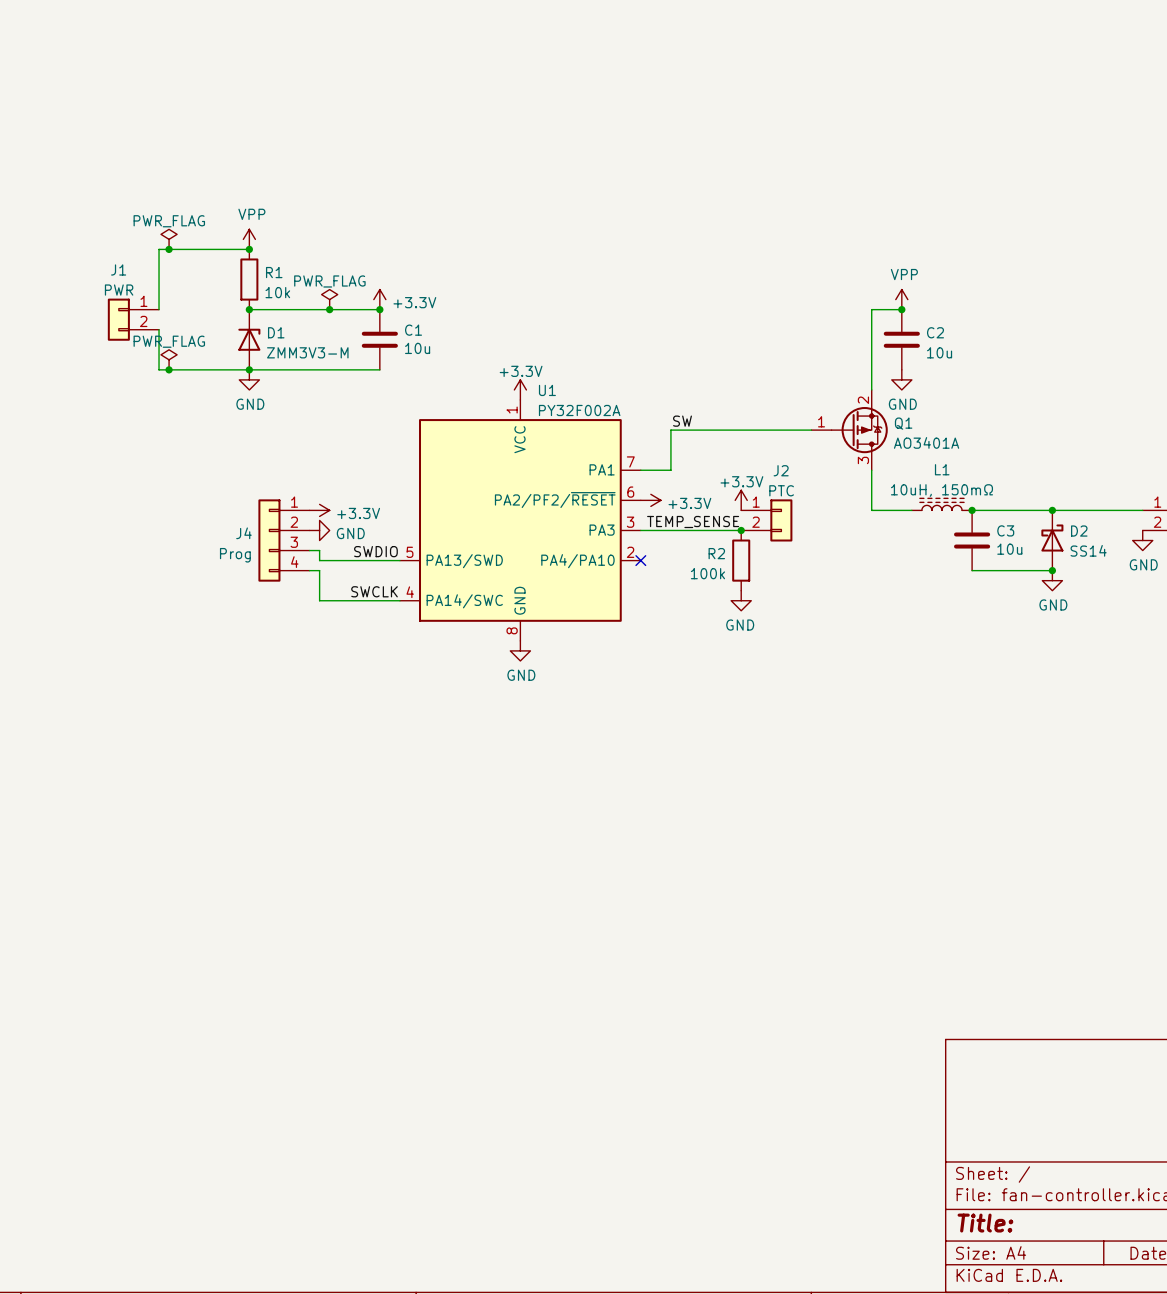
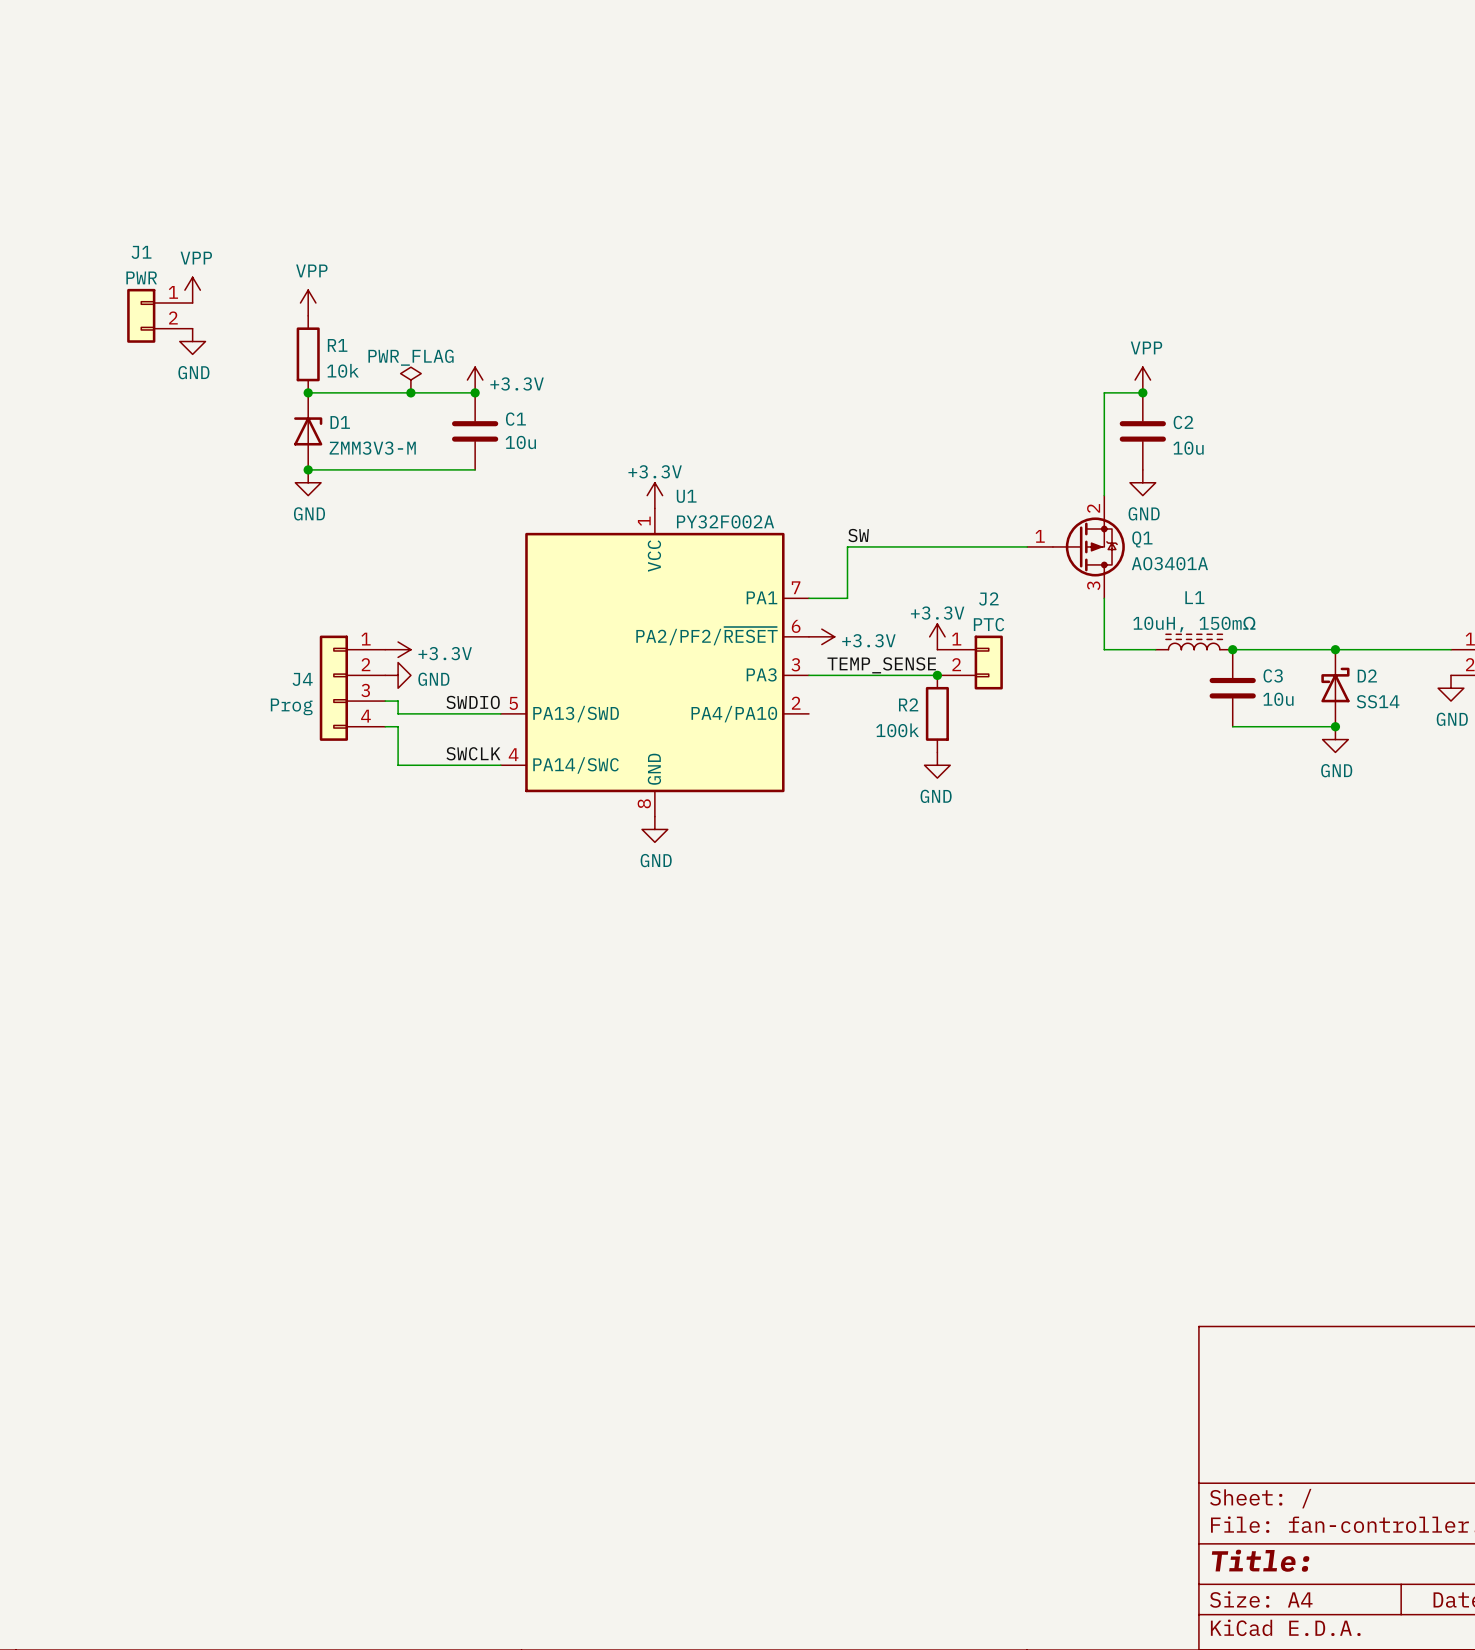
power symbol: none -> VPP (192, 290)
power symbol: PWR_FLAG (169, 239) -> none
junction: (169, 249) -> none
wire: (249, 249) (159, 249) (159, 309) -> none
junction: (249, 249) -> none
power symbol: none -> GND (192, 341)
J1 position: (133, 319) -> (159, 315)
wire: (159, 329) (159, 369) (249, 369) -> none
power symbol: PWR_FLAG (169, 359) -> none
junction: (169, 369) -> none
no-connect mark: (640, 560) -> none

